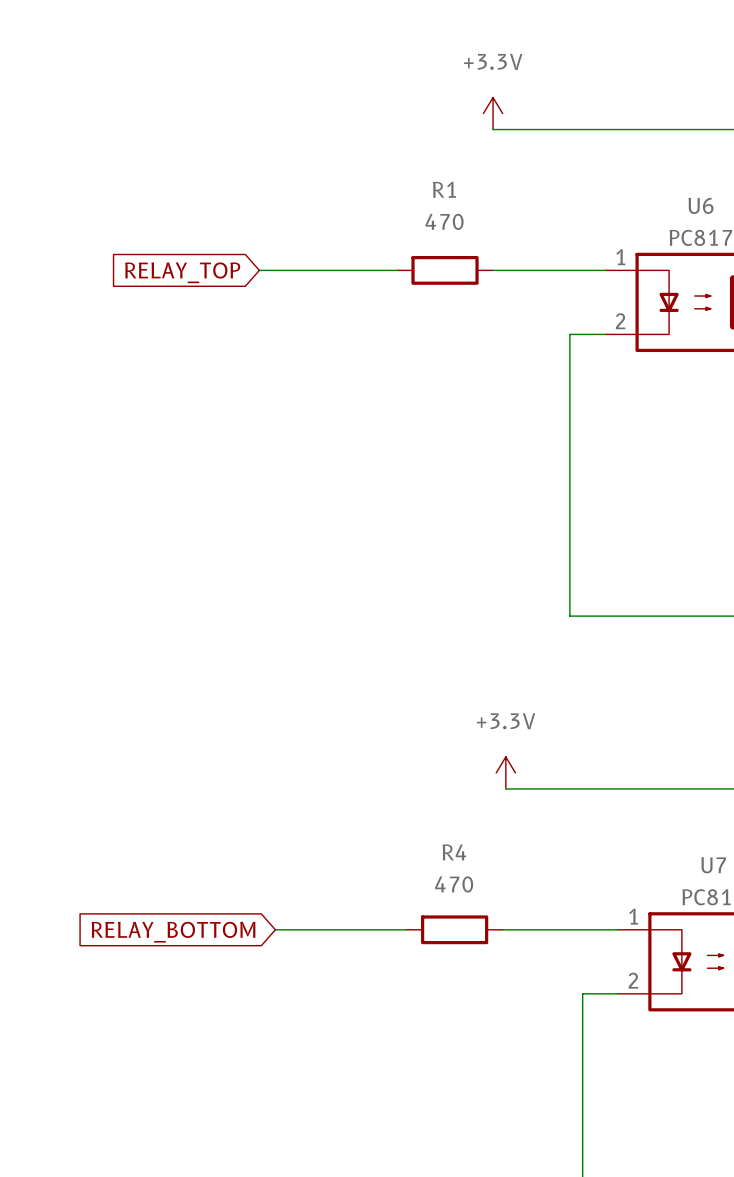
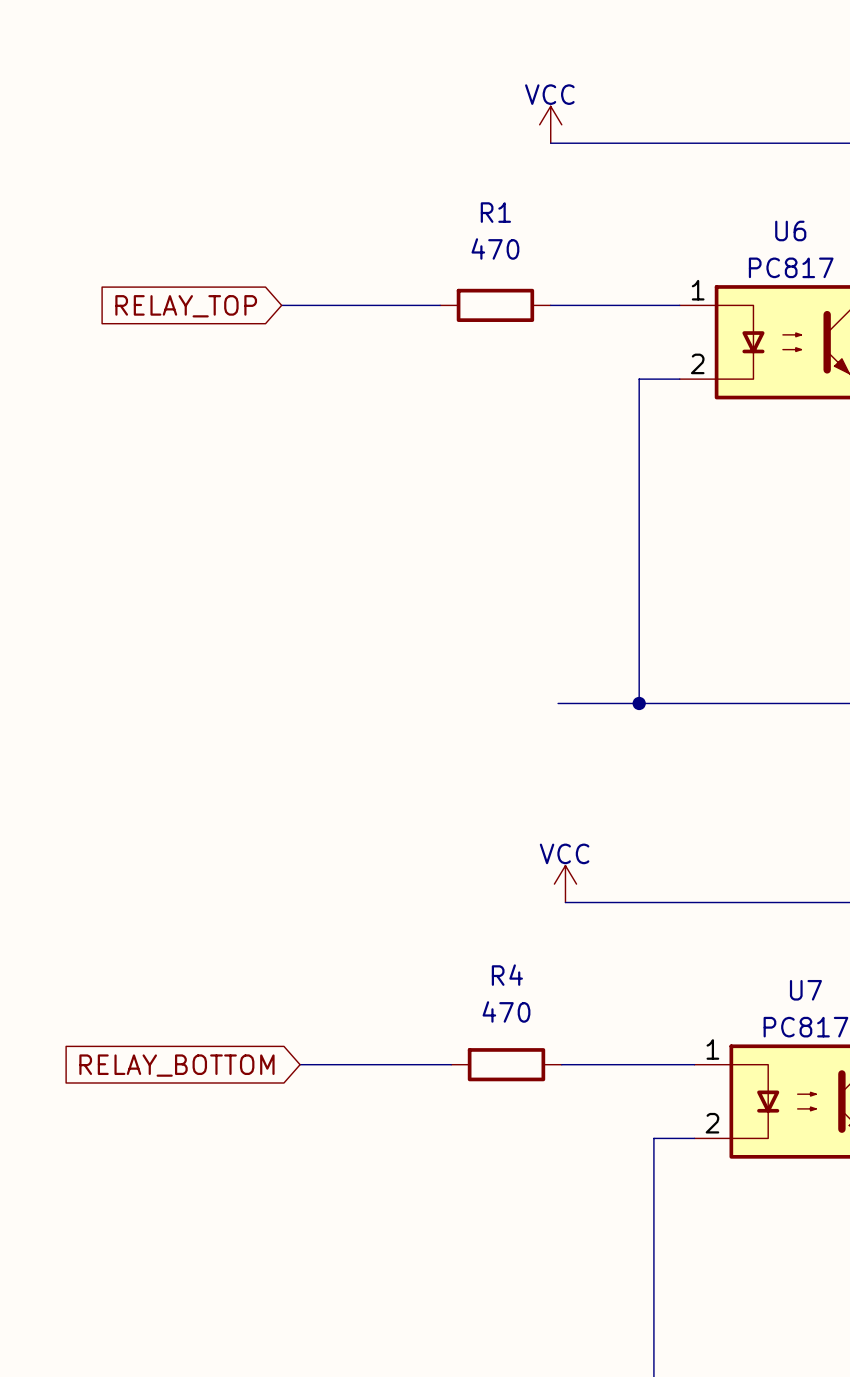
power symbol: +3.3V (493, 113) -> VCC (550, 124)
wire: none -> (558, 703) (639, 703)
junction: none -> (639, 703)
power symbol: +3.3V (505, 772) -> VCC (565, 884)

